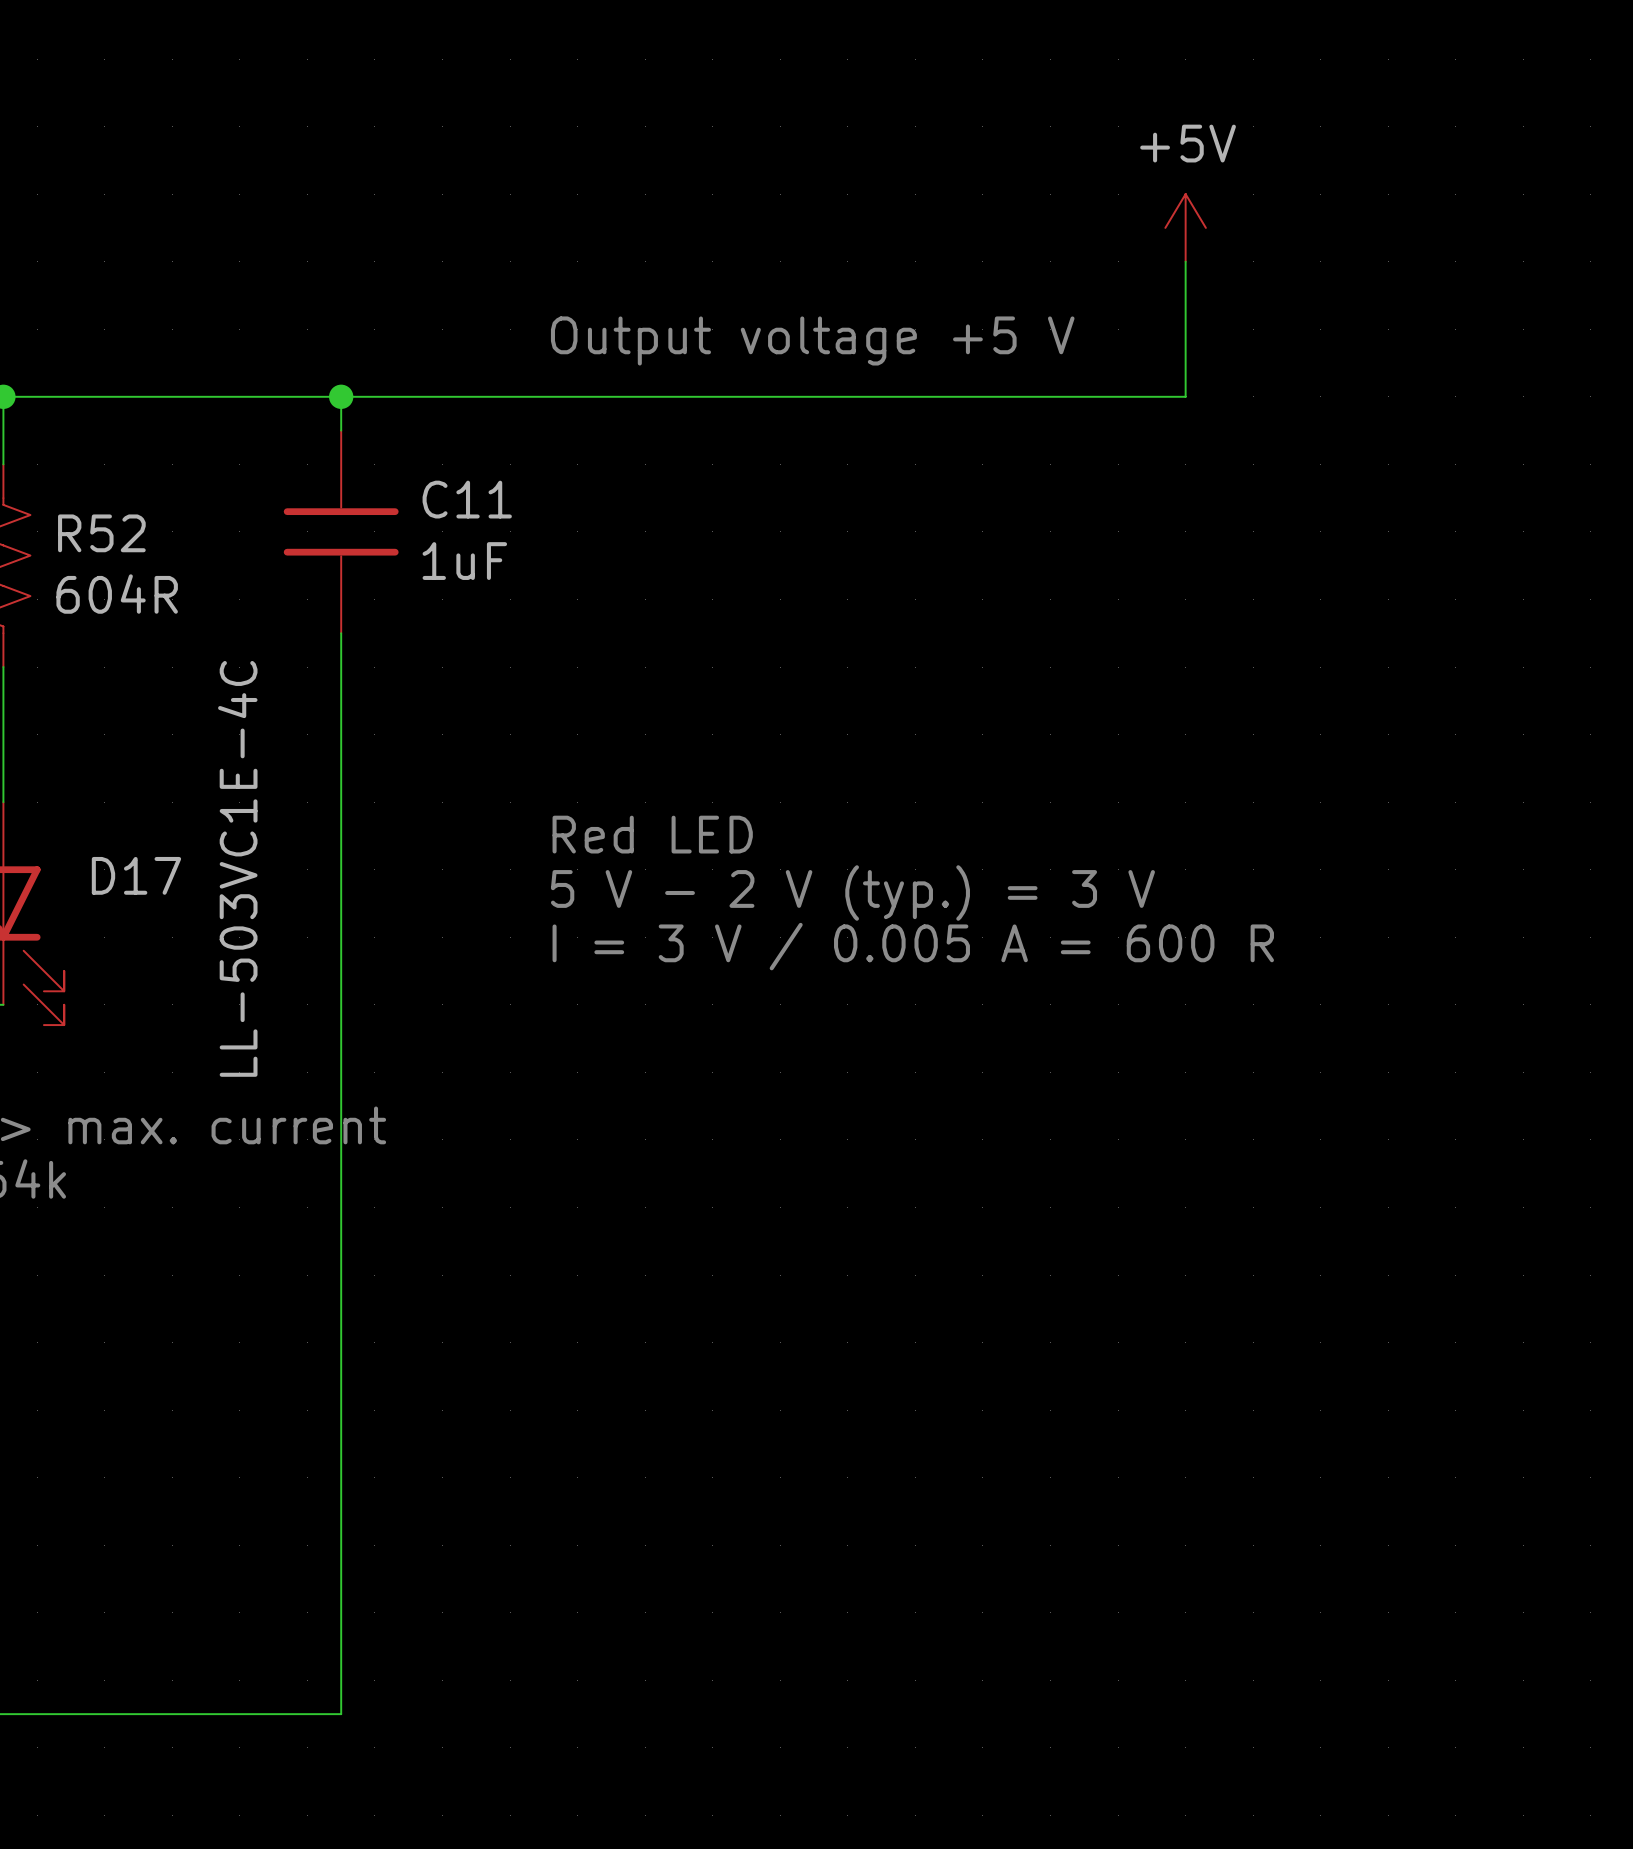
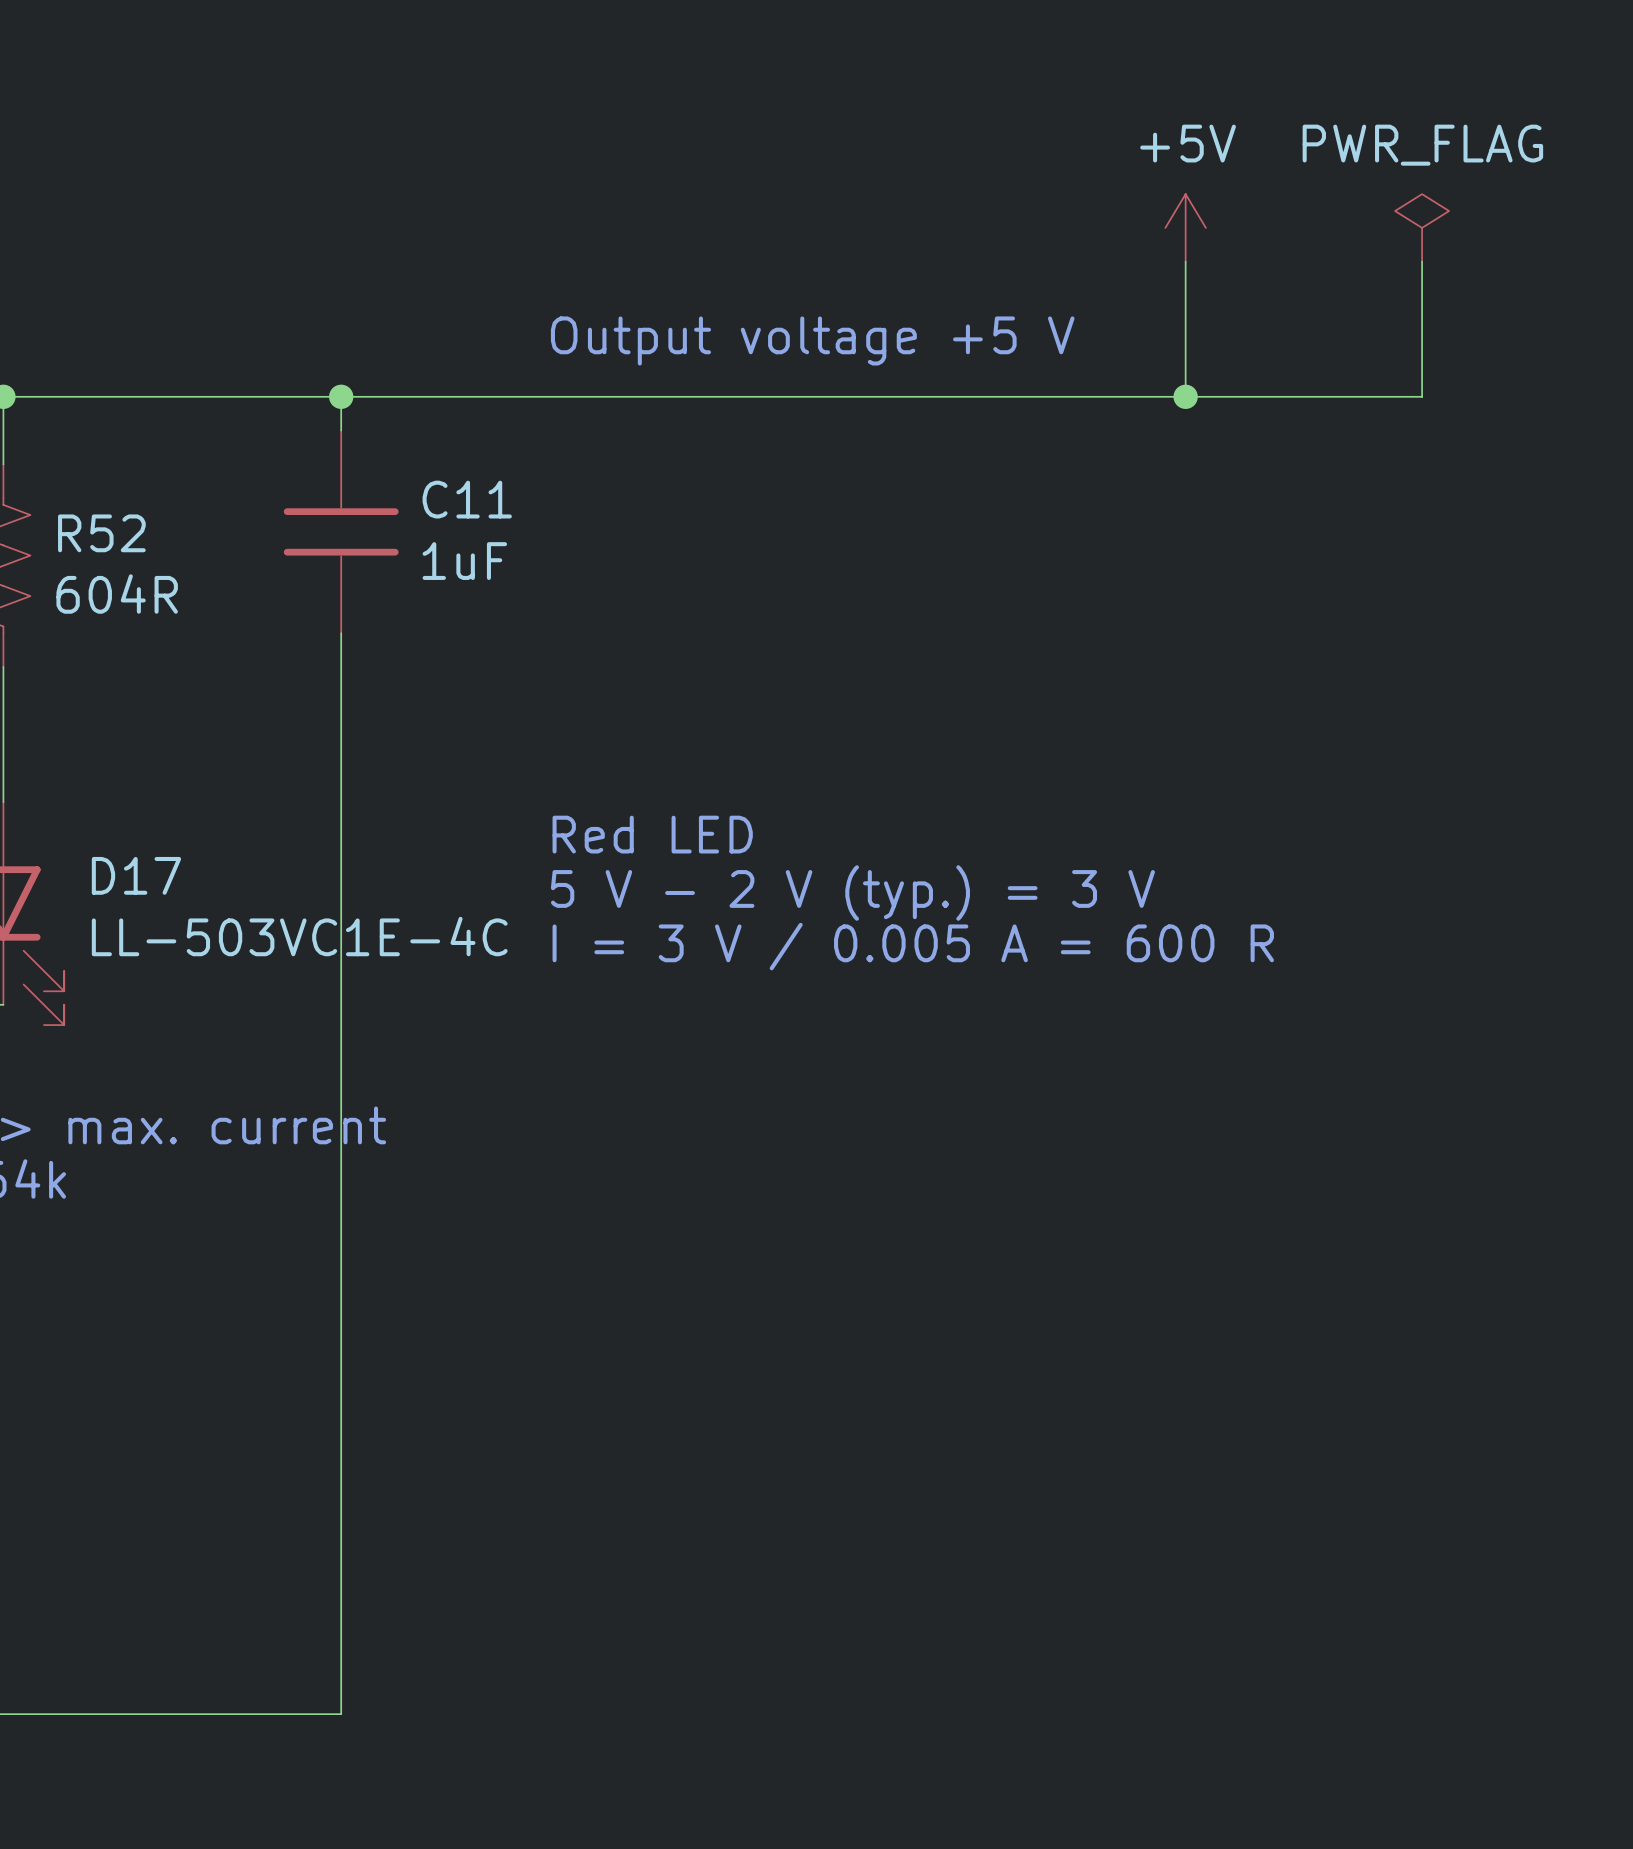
power symbol: none -> PWR_FLAG (1422, 227)
wire: none -> (1422, 261) (1422, 396) (1185, 396)
junction: none -> (1185, 396)
D17 value rotation: 0° (237, 868) -> 90° clockwise (299, 936)

